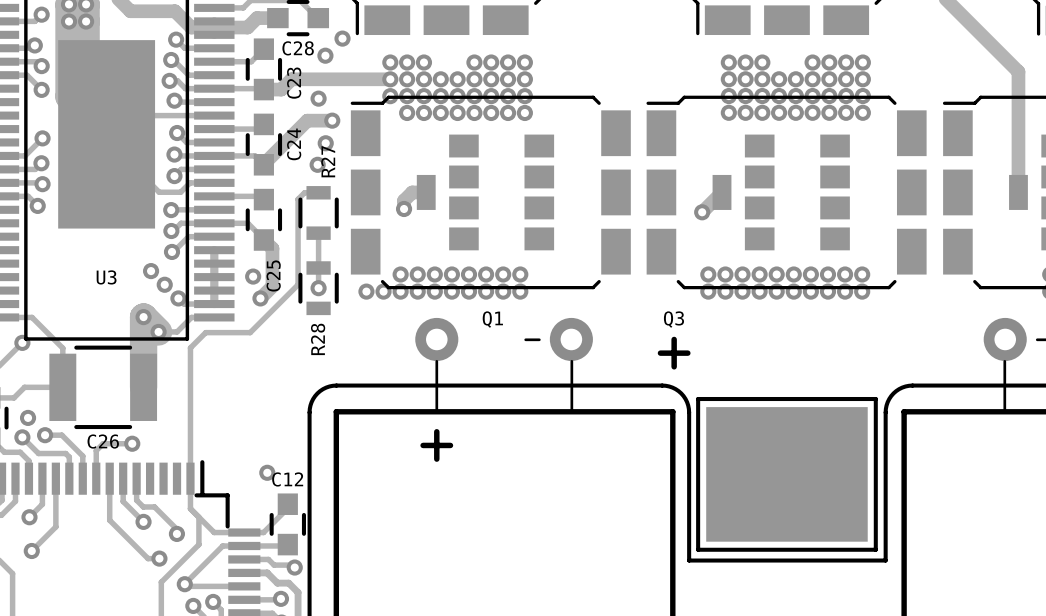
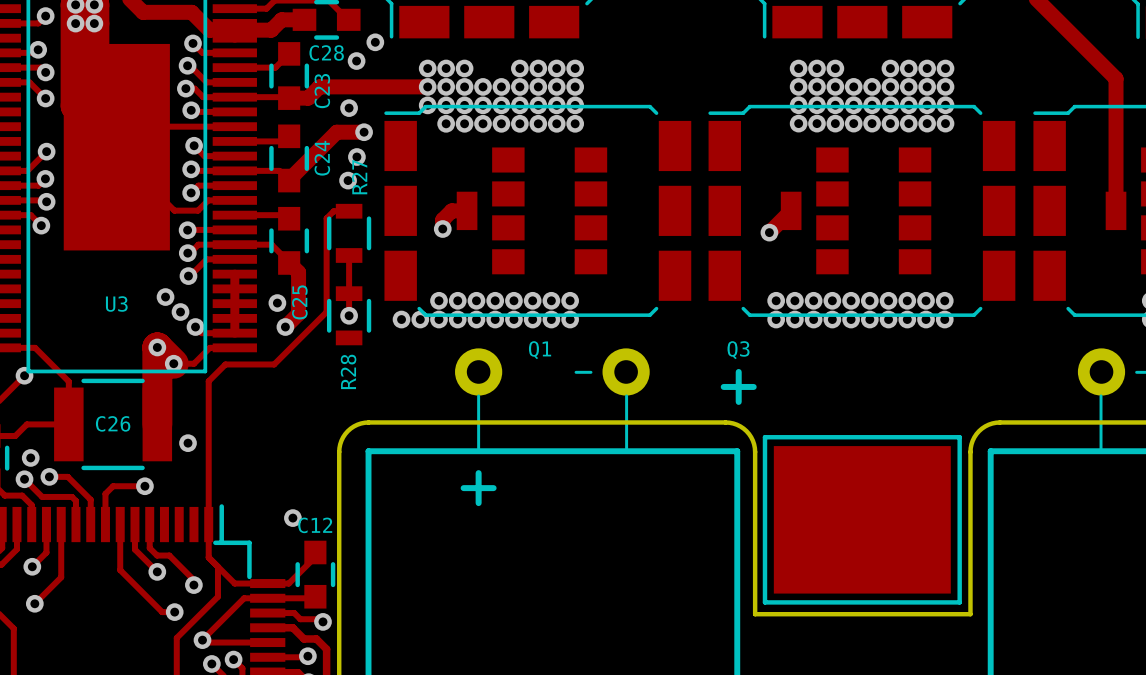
via: none -> (188, 443)
C26 name position: C26 (103, 441) -> C26 (113, 423)

